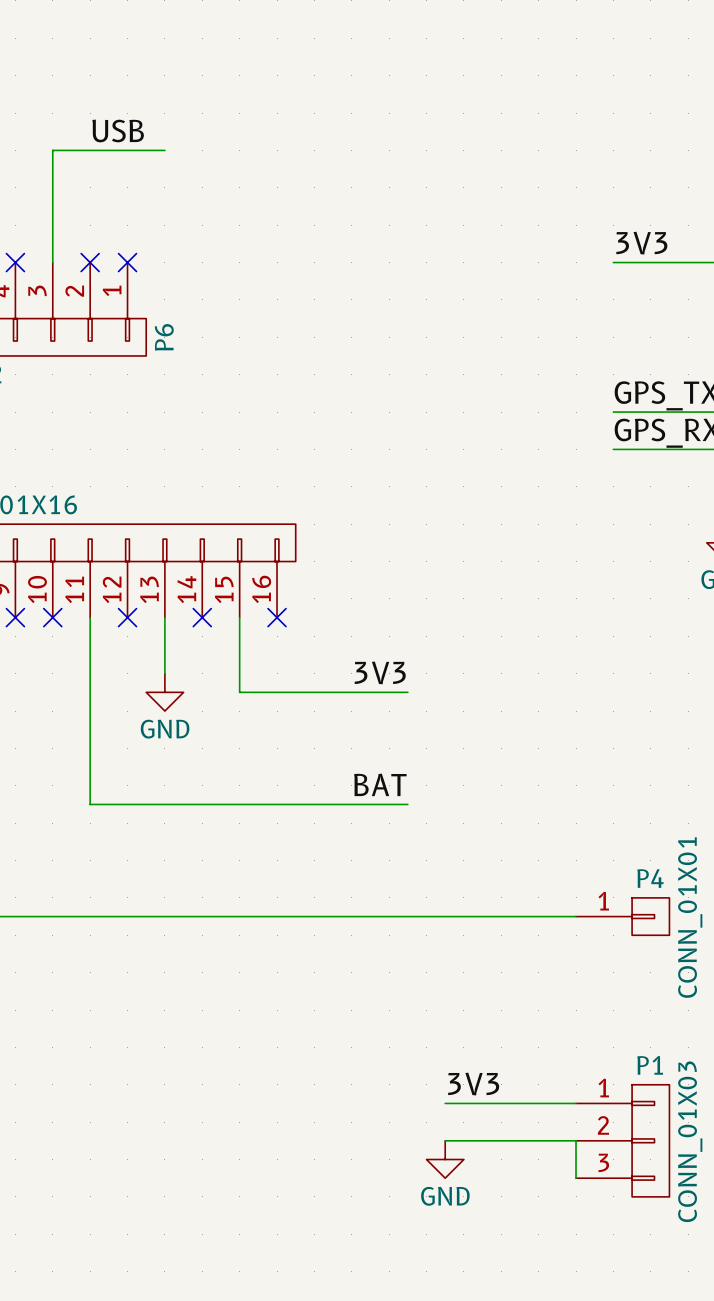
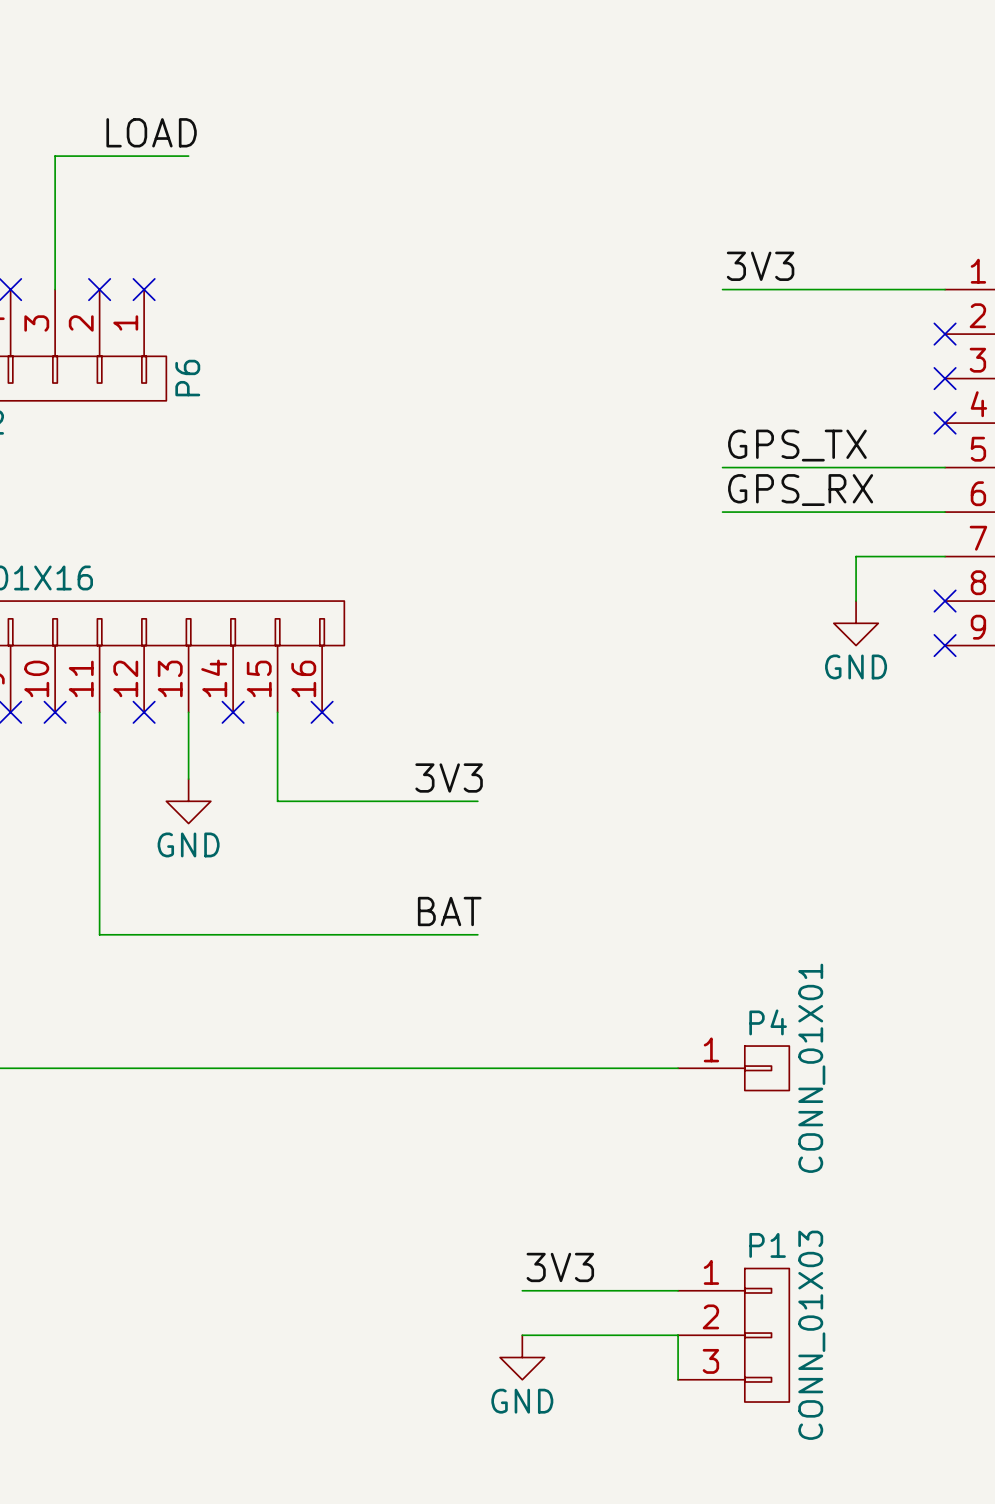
label: USB (118, 130) -> LOAD (151, 132)

